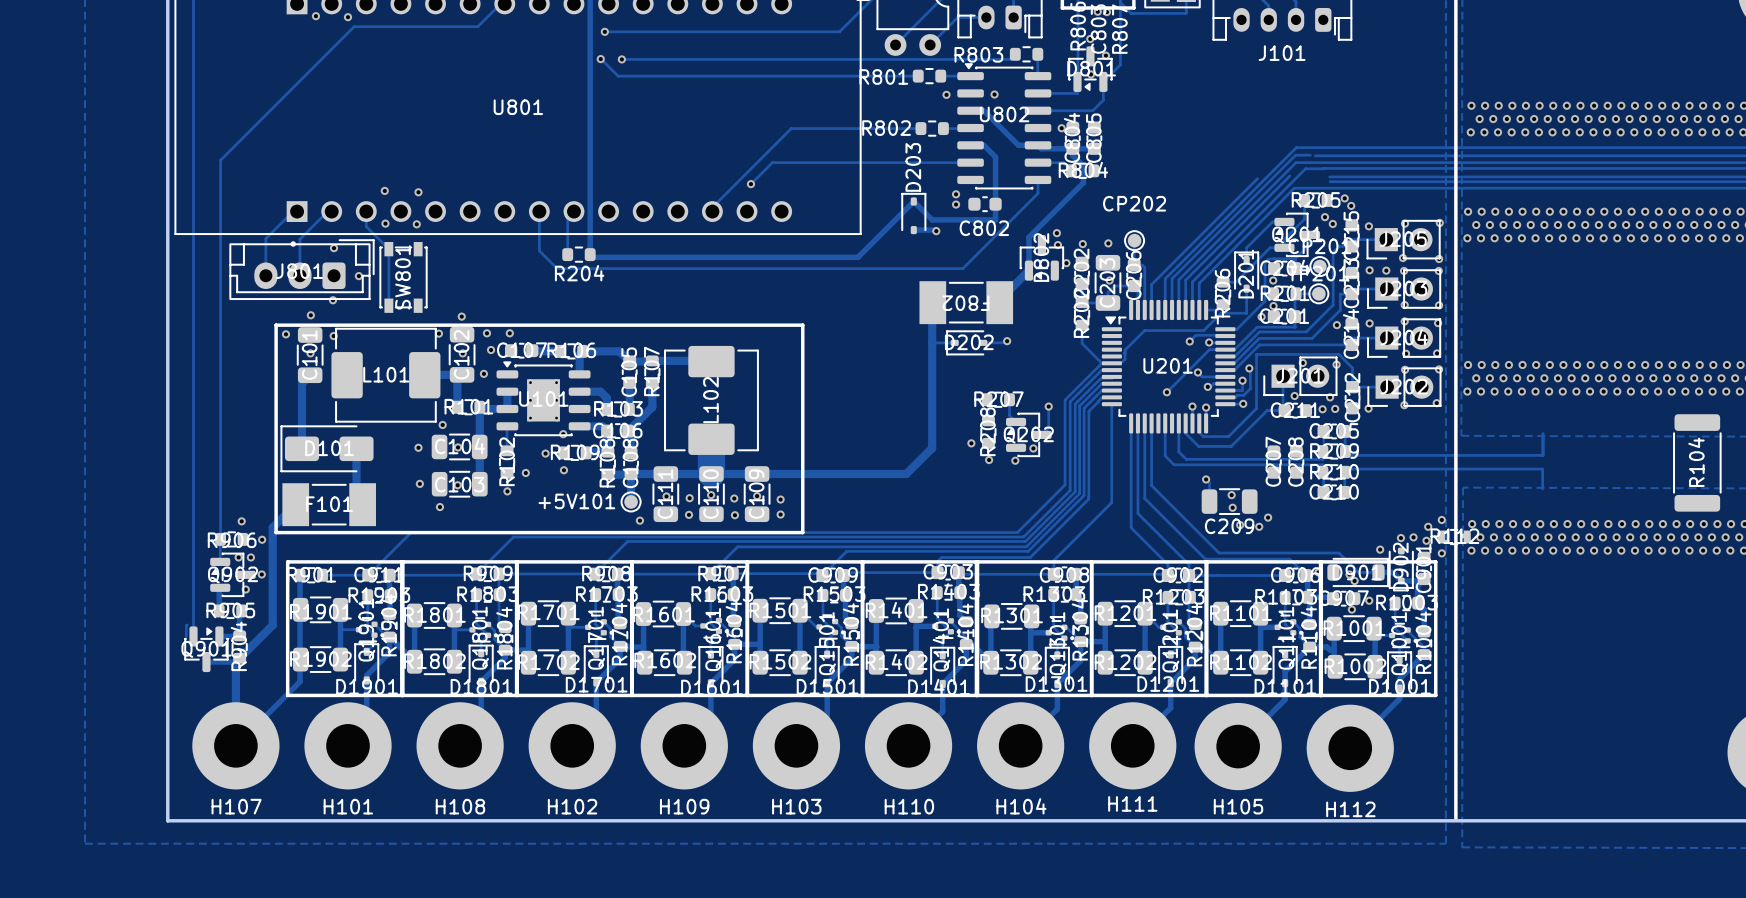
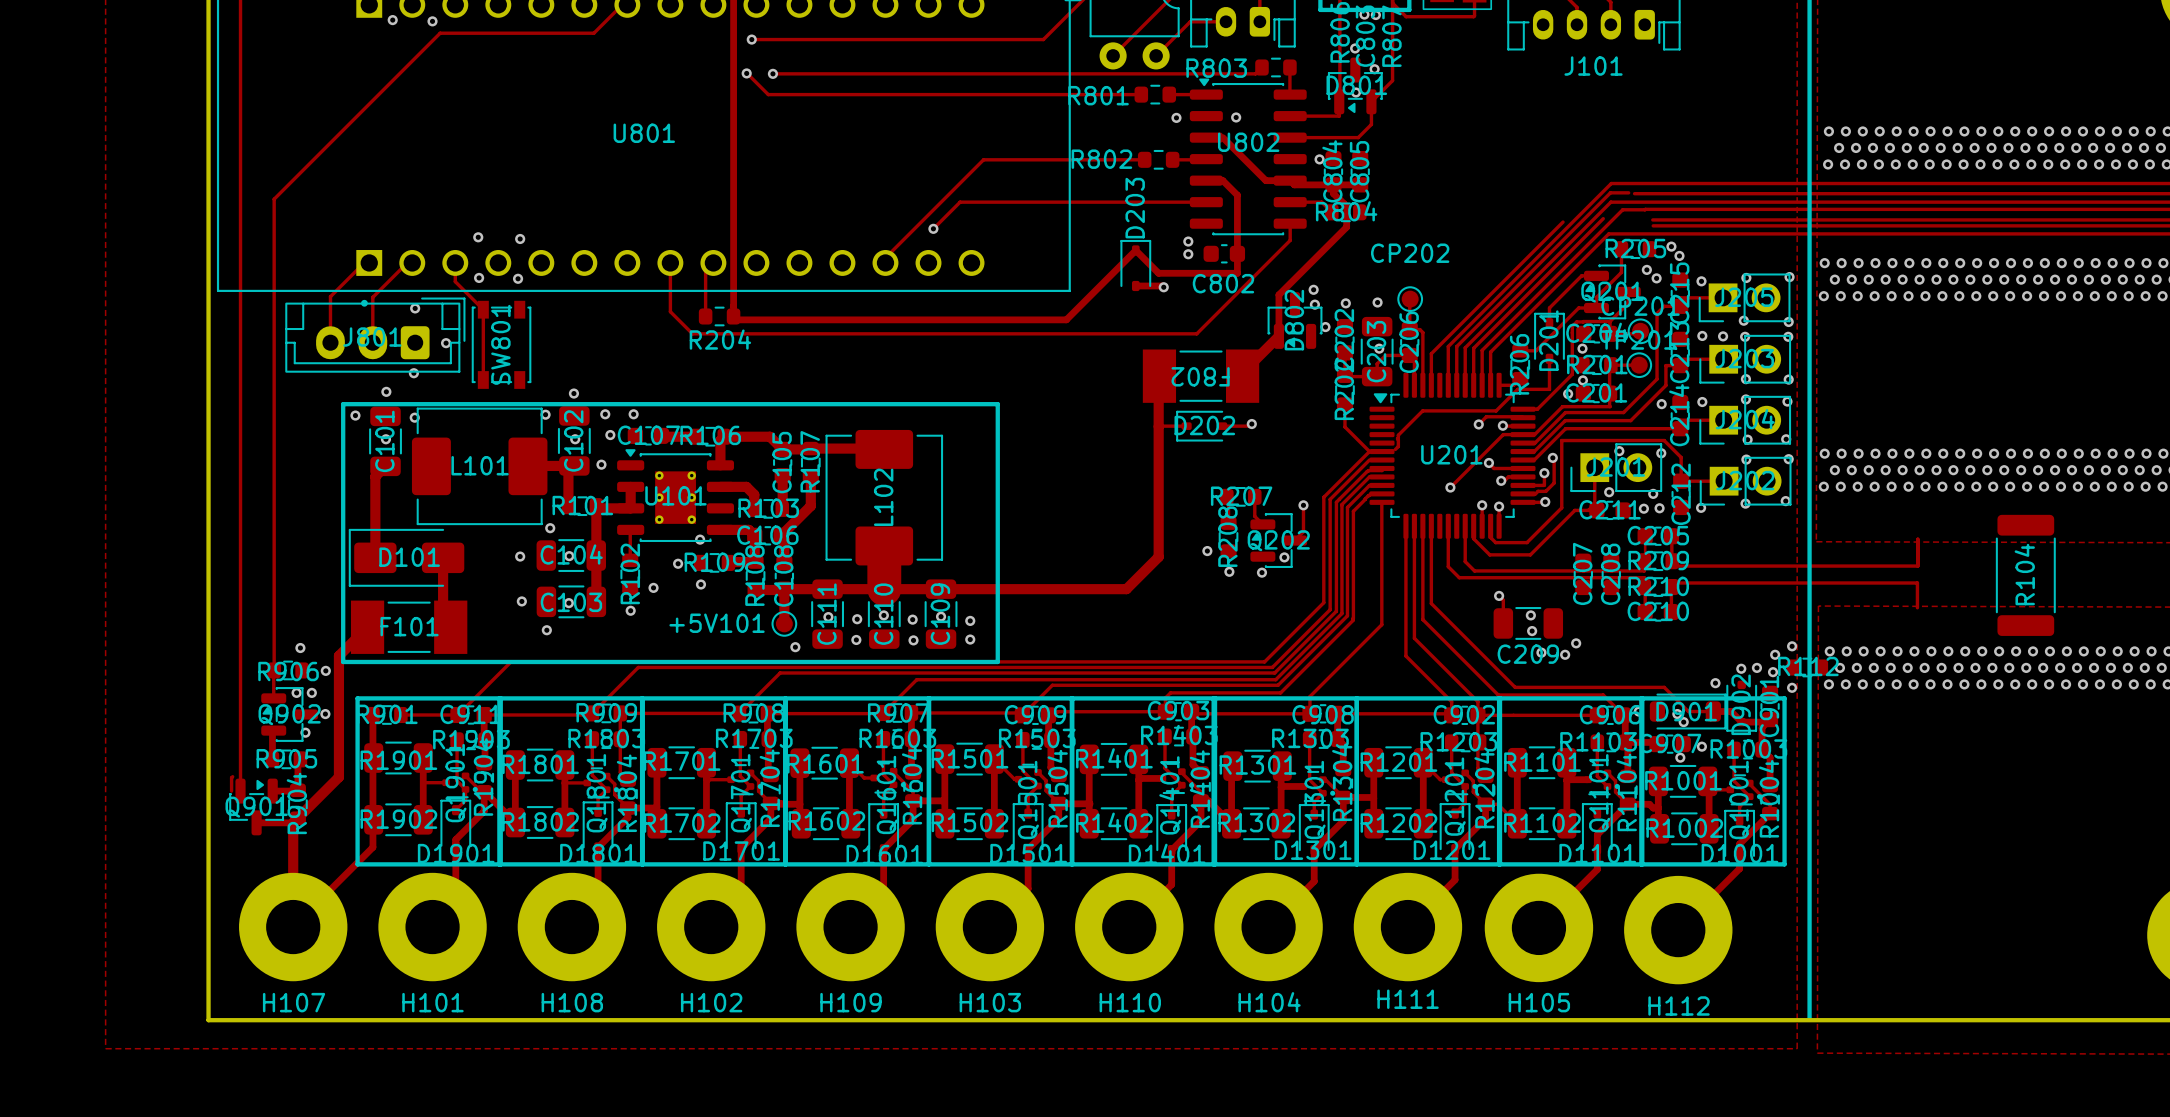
R104 position: (1697, 462) -> (2025, 575)

